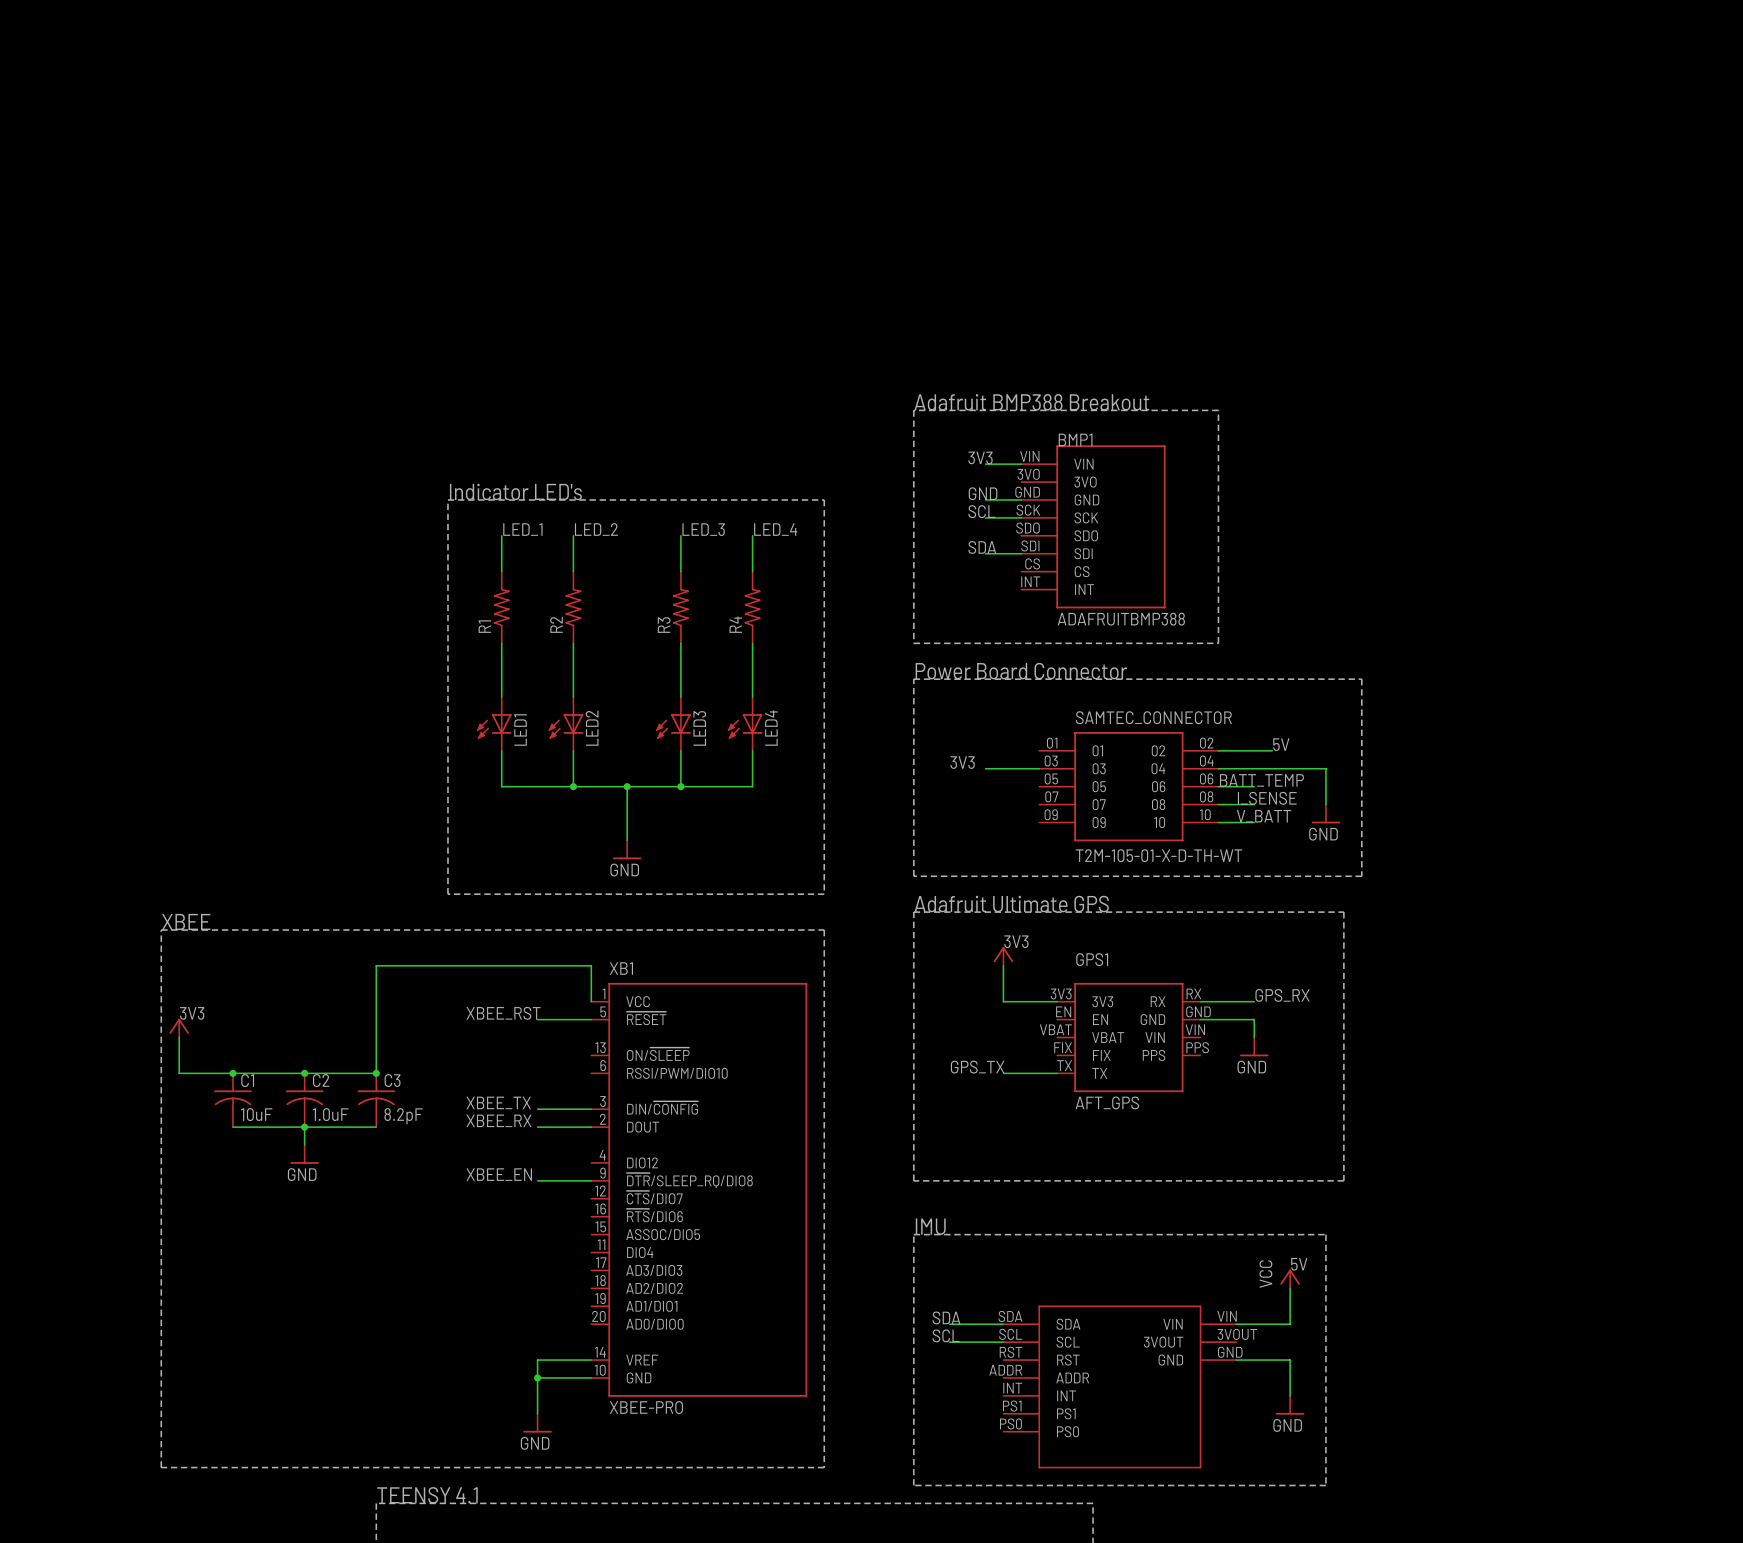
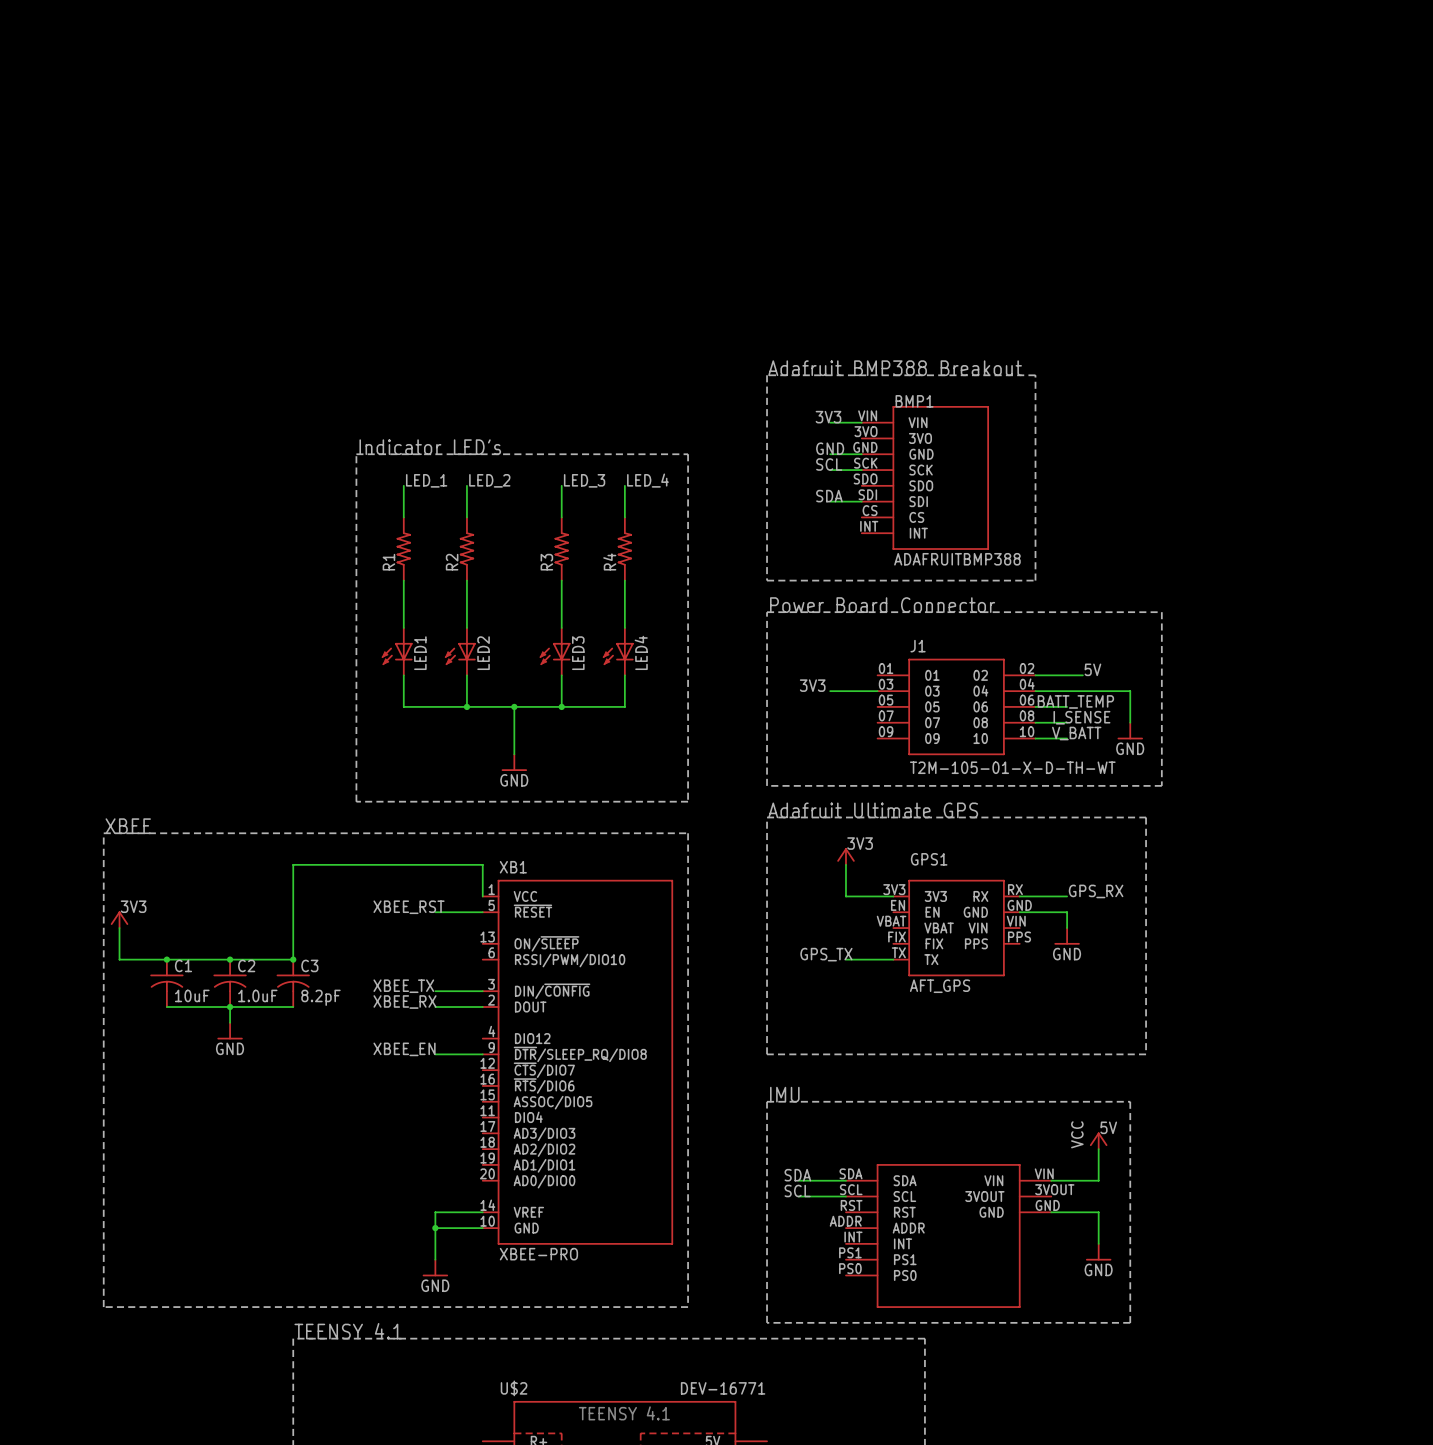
SAMTEC_CONNECTOR name: SAMTEC_CONNECTOR (1153, 717) -> J1 (918, 646)

